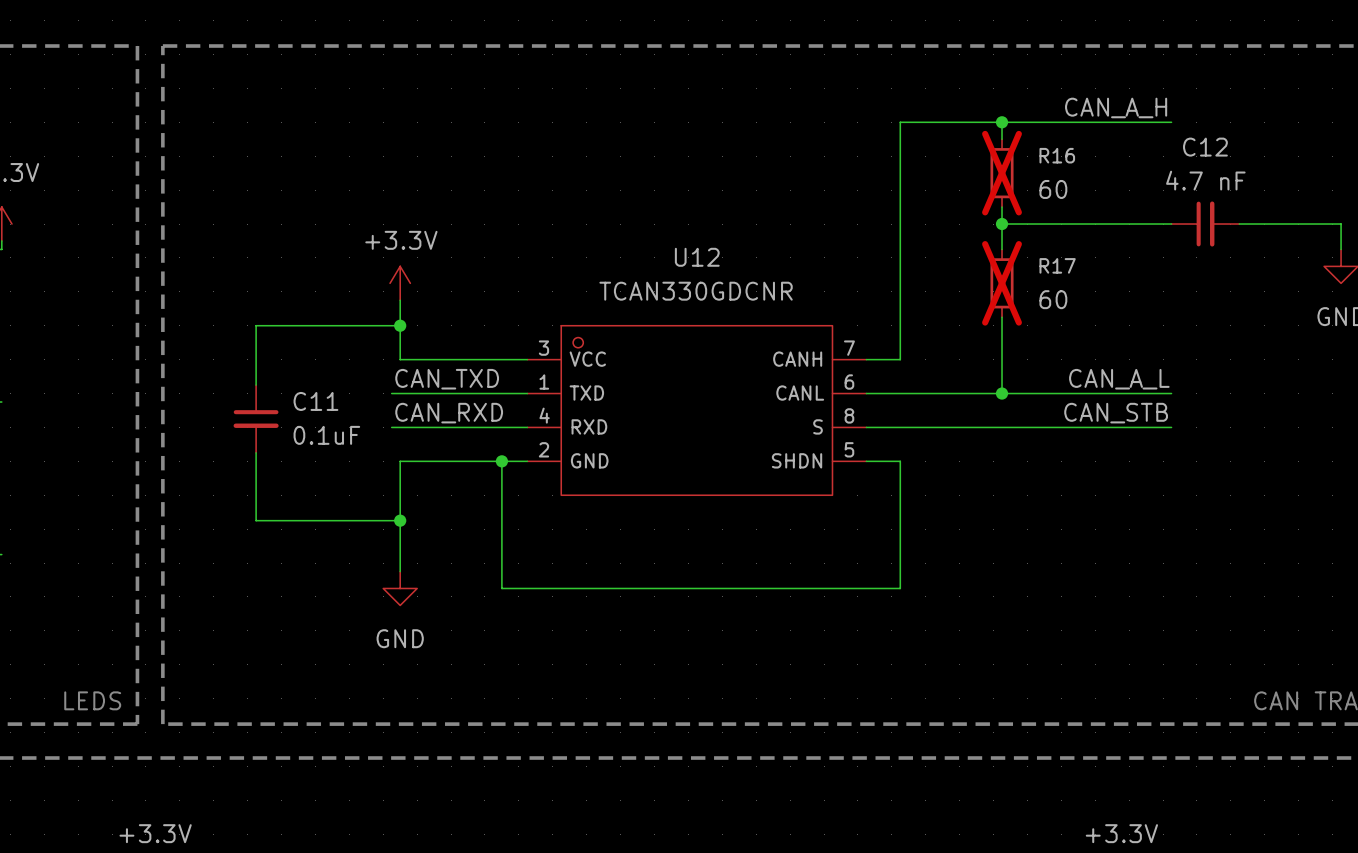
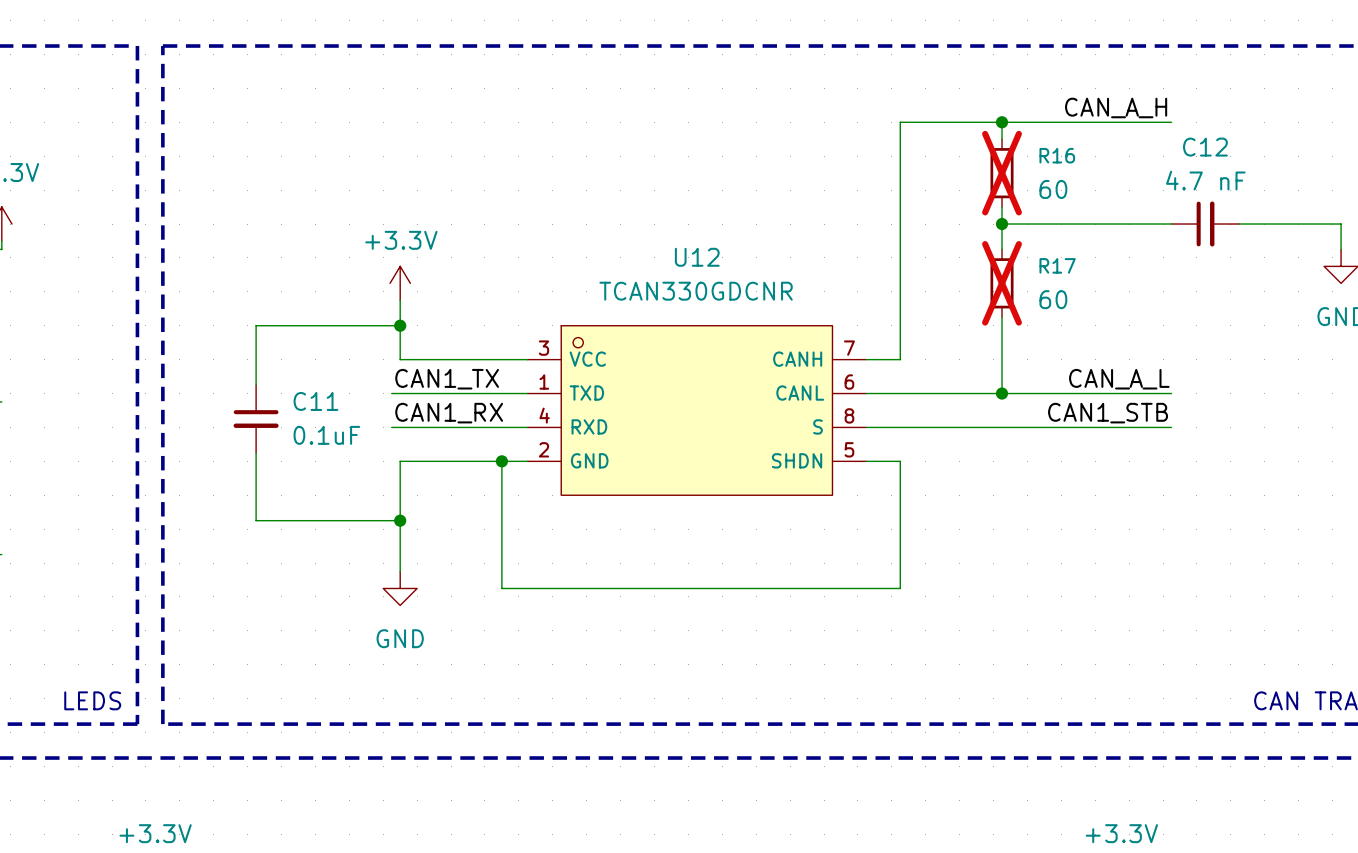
label: CAN_TXD (447, 379) -> CAN1_TX (447, 379)
label: CAN_RXD (449, 413) -> CAN1_RX (449, 413)
label: CAN_STB (1116, 413) -> CAN1_STB (1108, 413)

